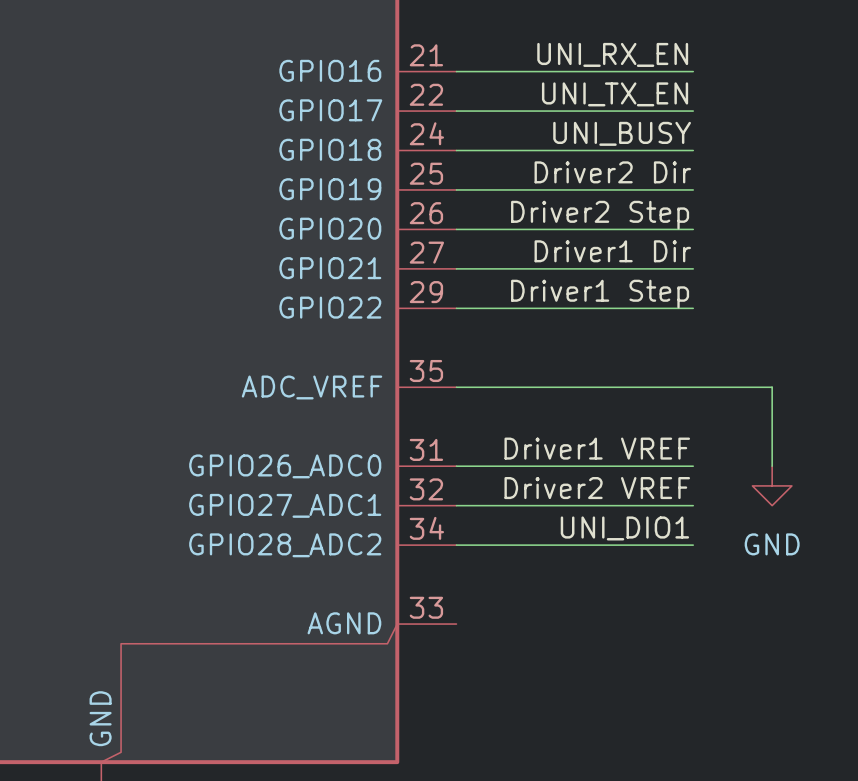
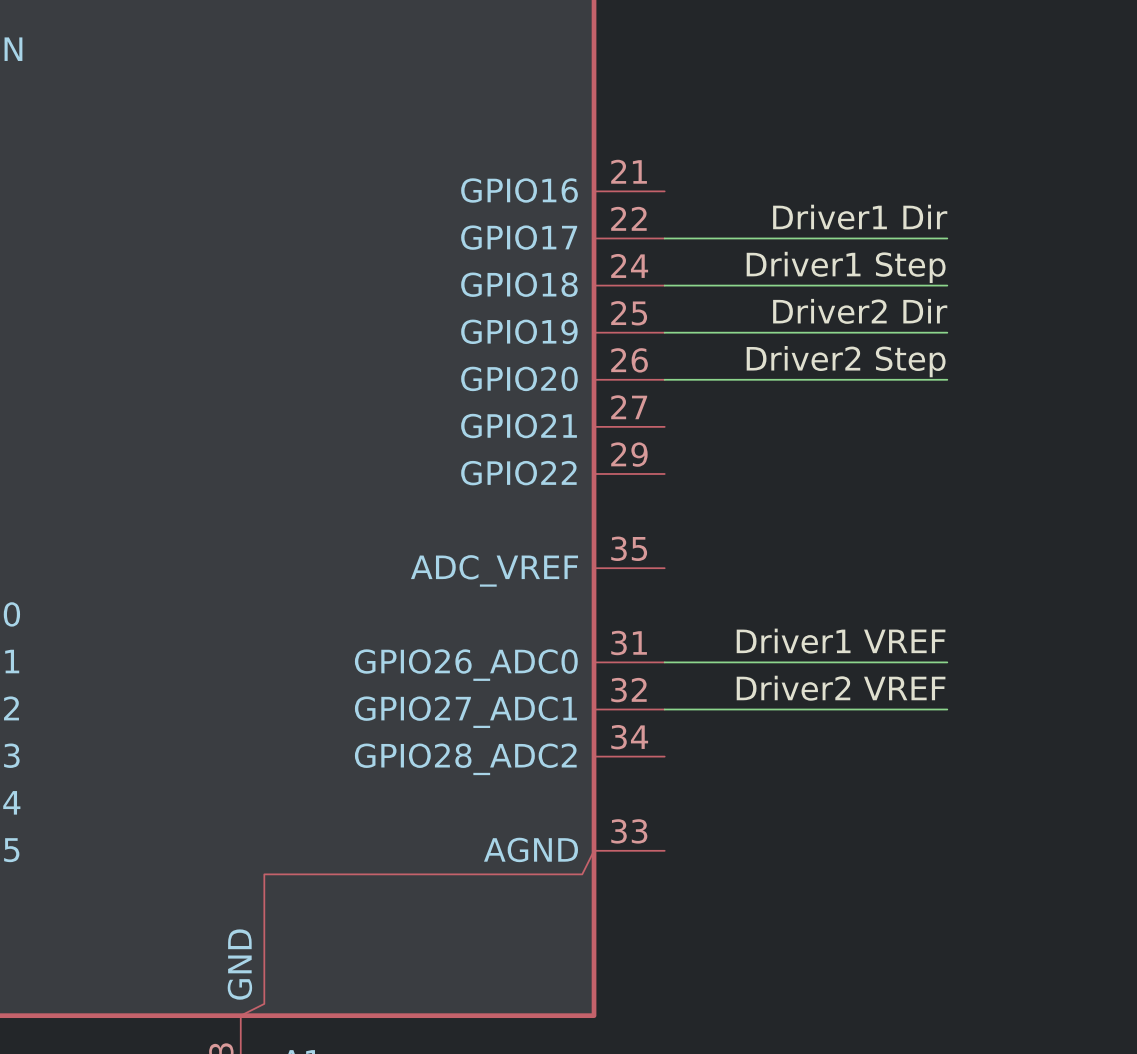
label: UNI_RX_EN (612, 54) -> none
wire: (456, 71) (693, 71) -> none
label: UNI_TX_EN (615, 94) -> Driver1 Dir (860, 217)
label: UNI_BUSY (622, 133) -> Driver1 Step (846, 267)
label: Driver1 Dir (612, 251) -> none
wire: (456, 268) (693, 268) -> none
label: Driver1 Step (600, 294) -> none
wire: (456, 308) (693, 308) -> none
wire: (456, 387) (772, 387) (772, 466) -> none
power symbol: GND (772, 485) -> none
label: UNI_DIO1 (624, 528) -> none
wire: (456, 545) (693, 545) -> none

